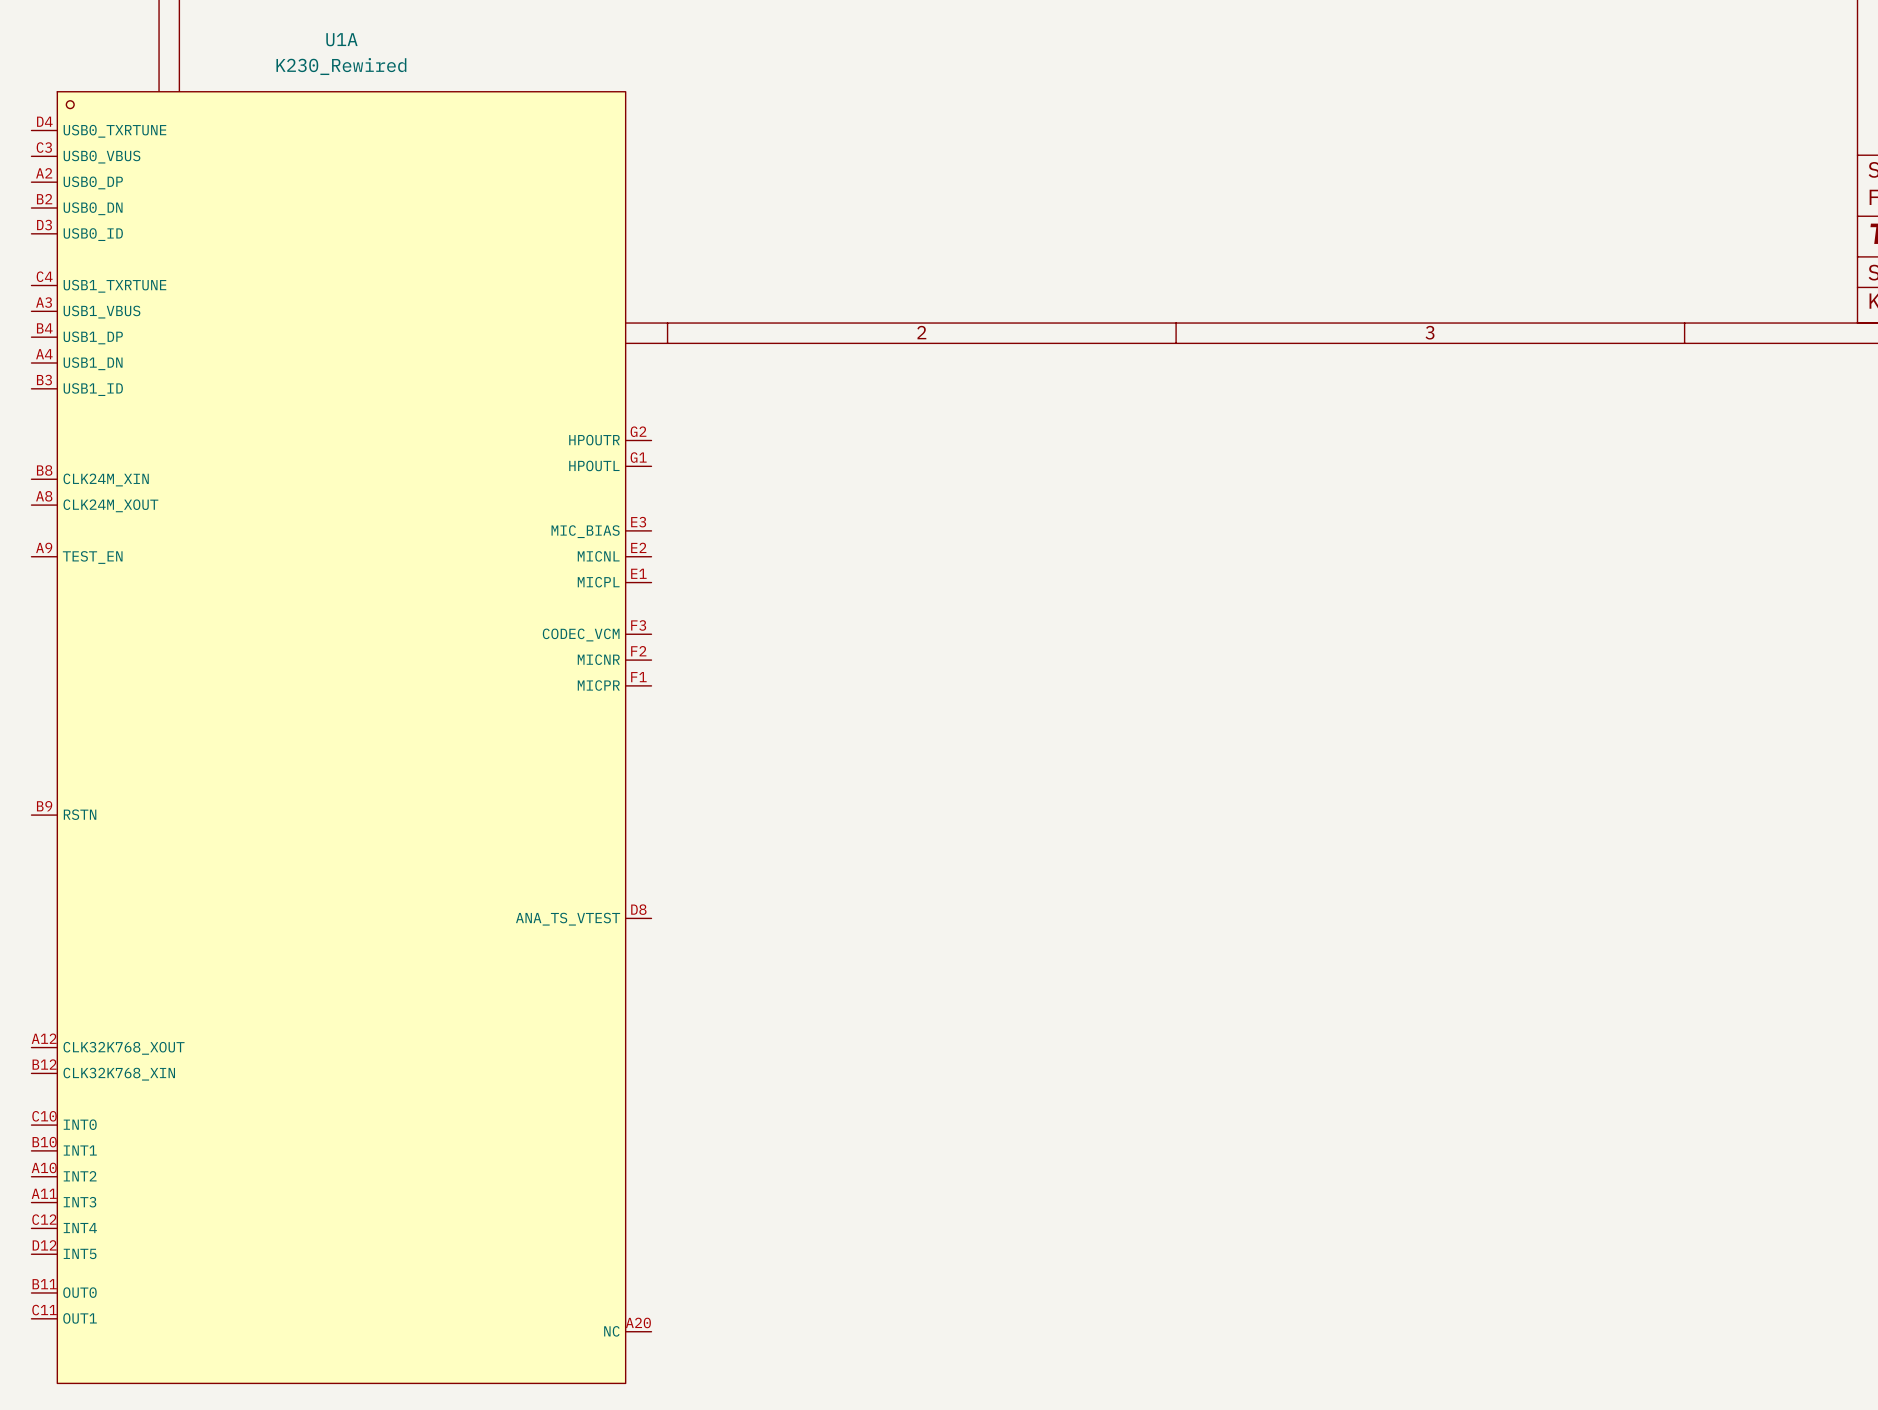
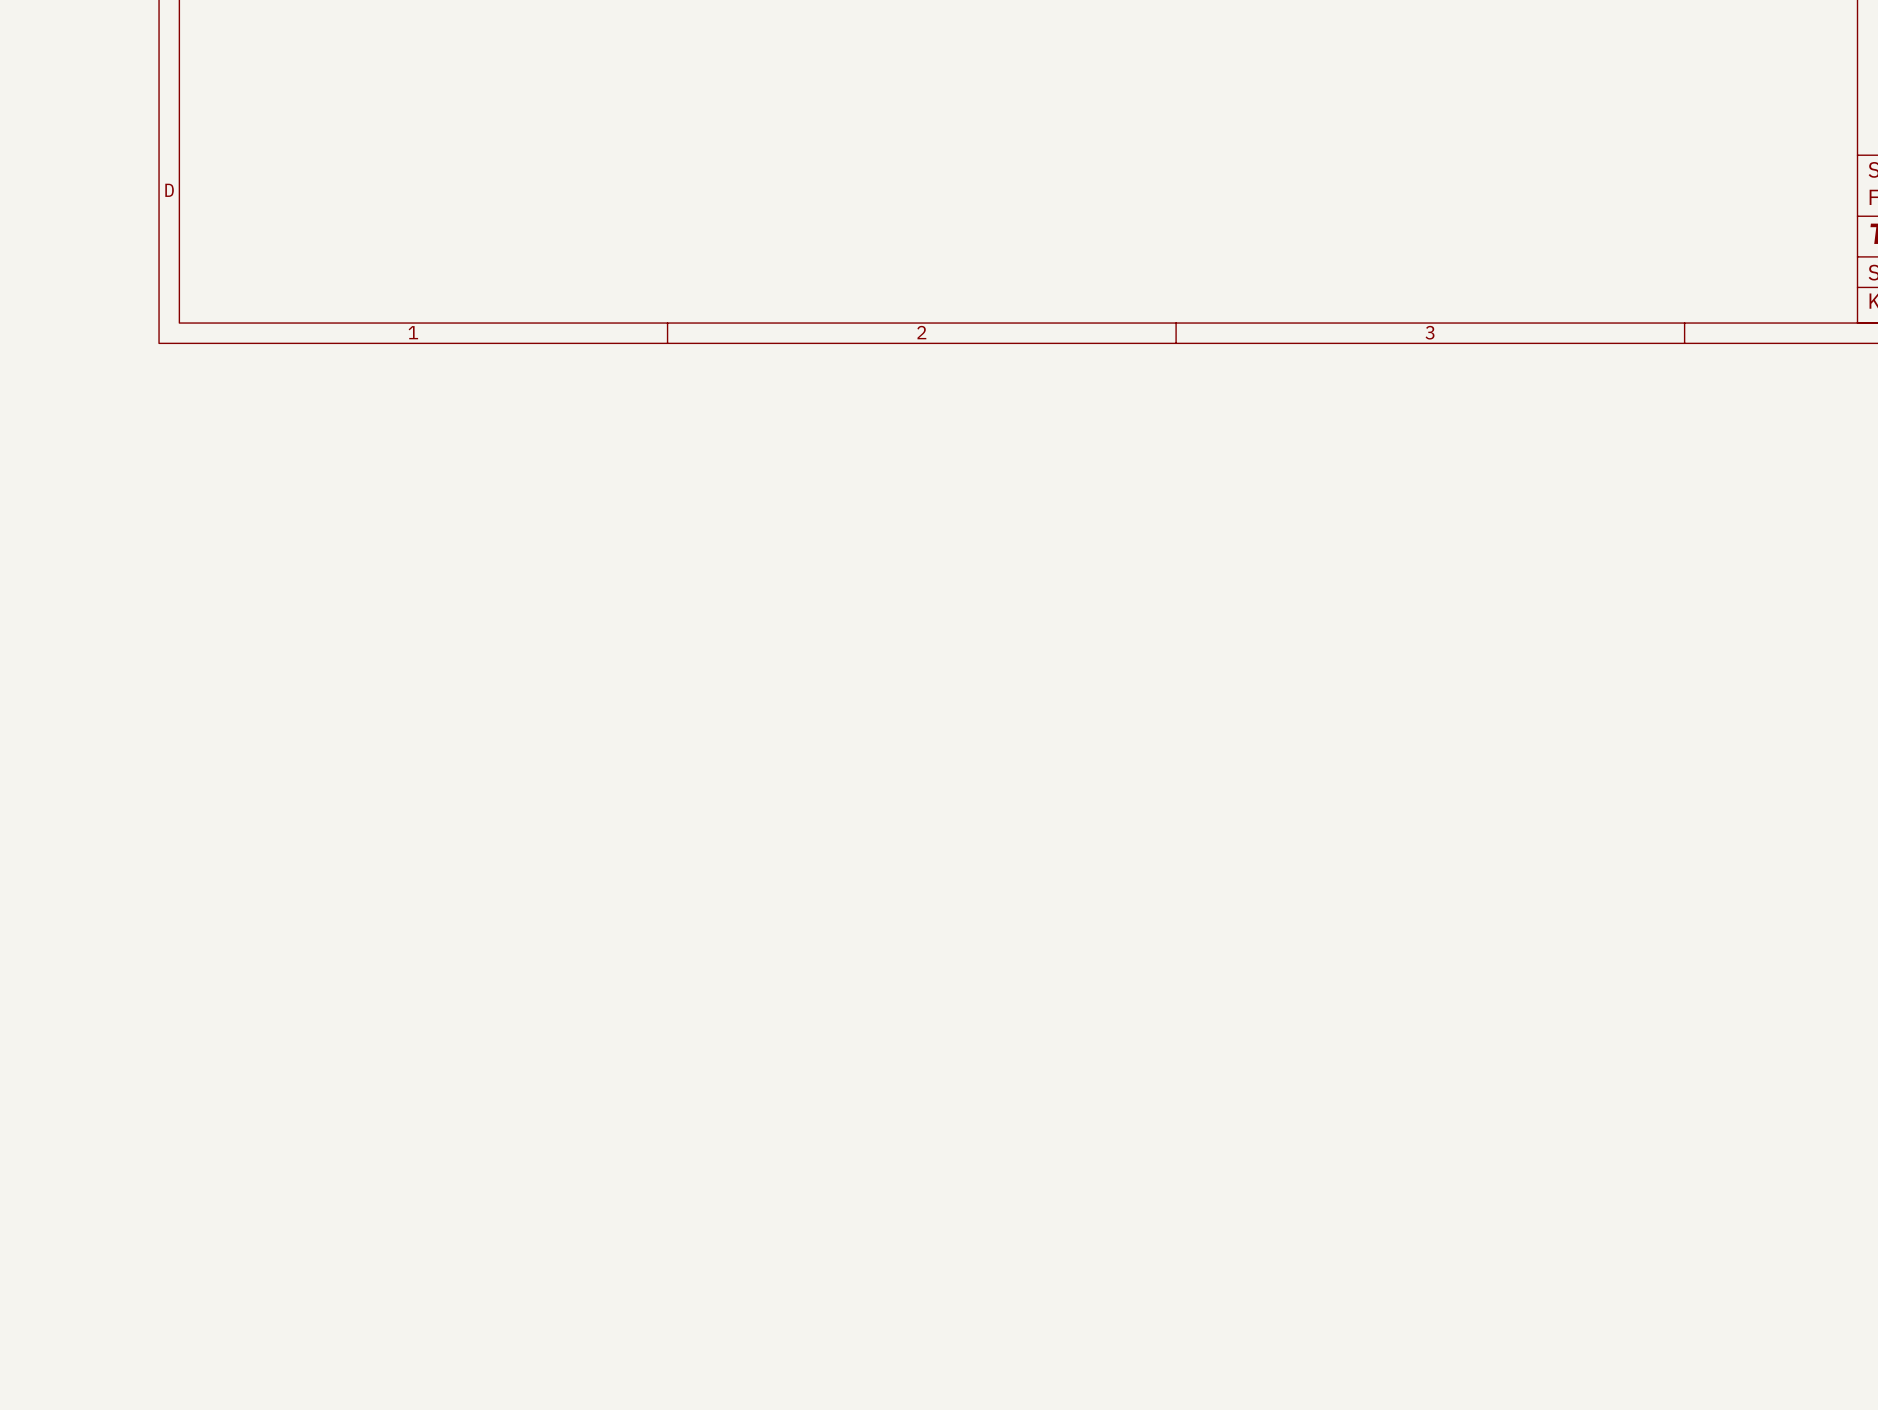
U1A: K230_Rewired (341, 737) -> none

